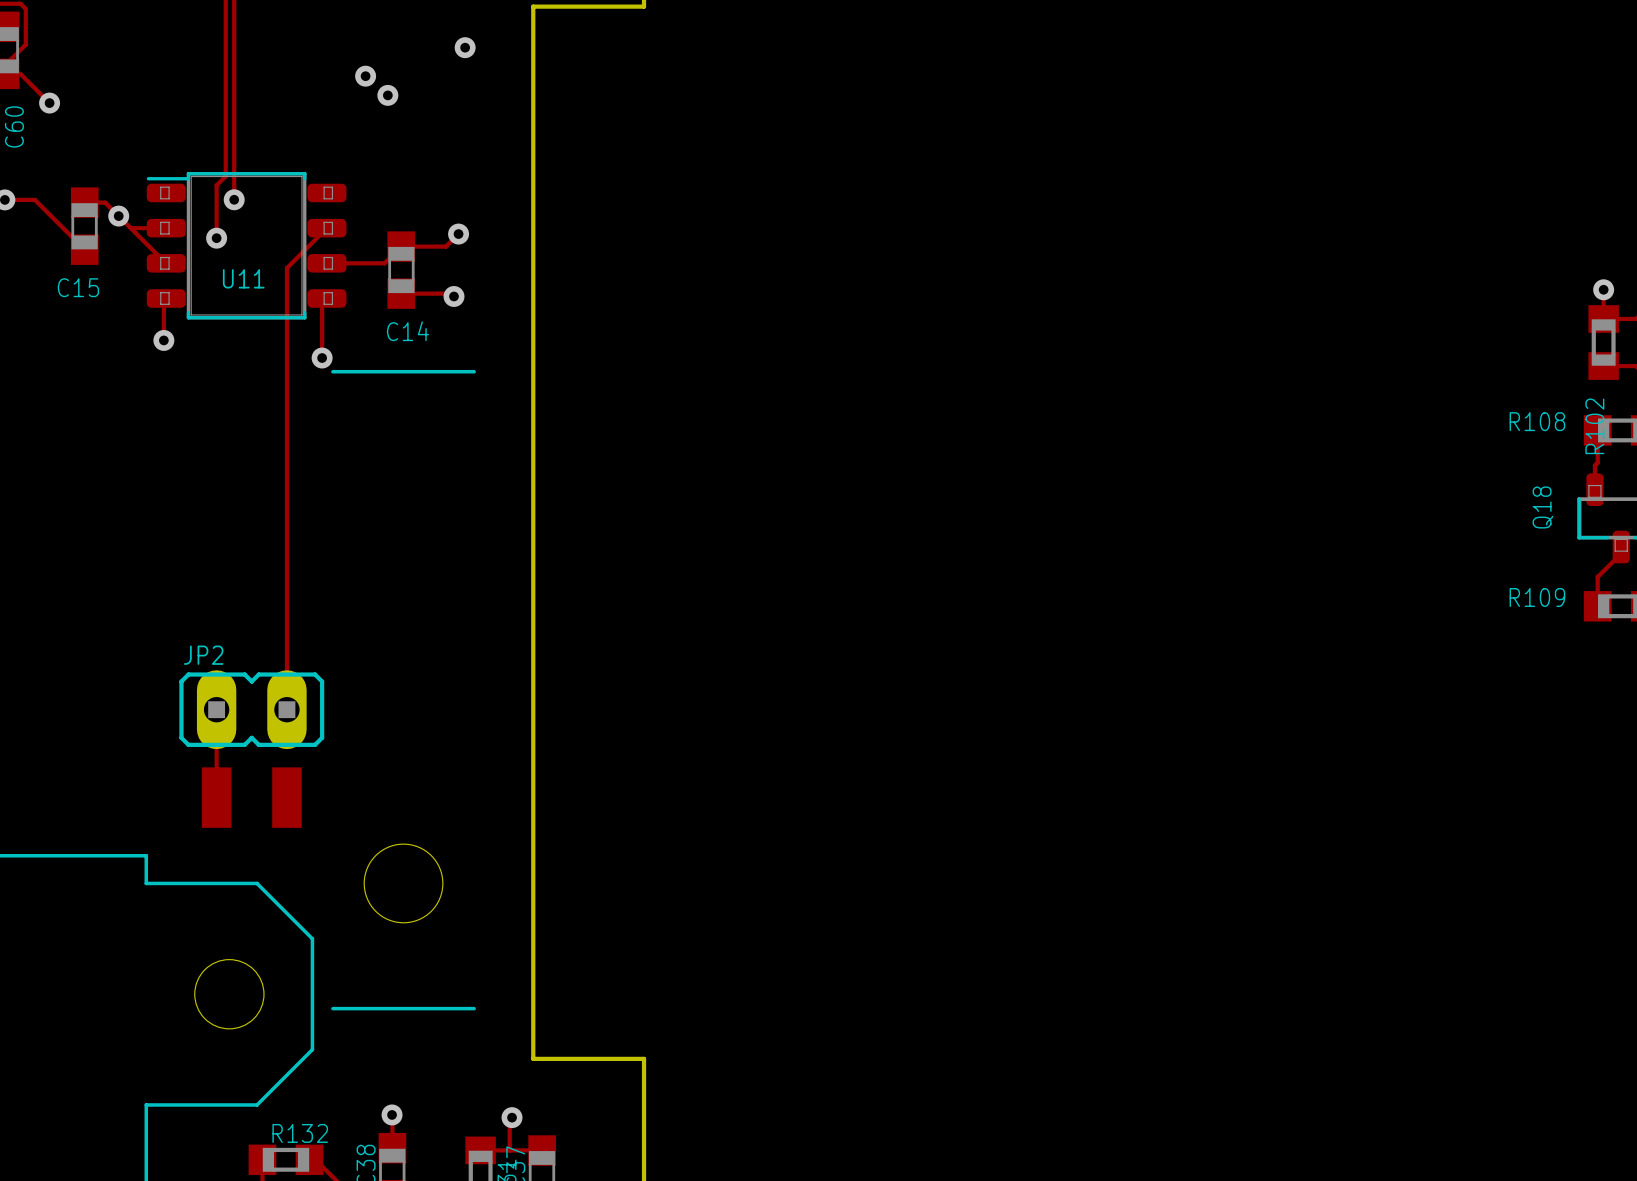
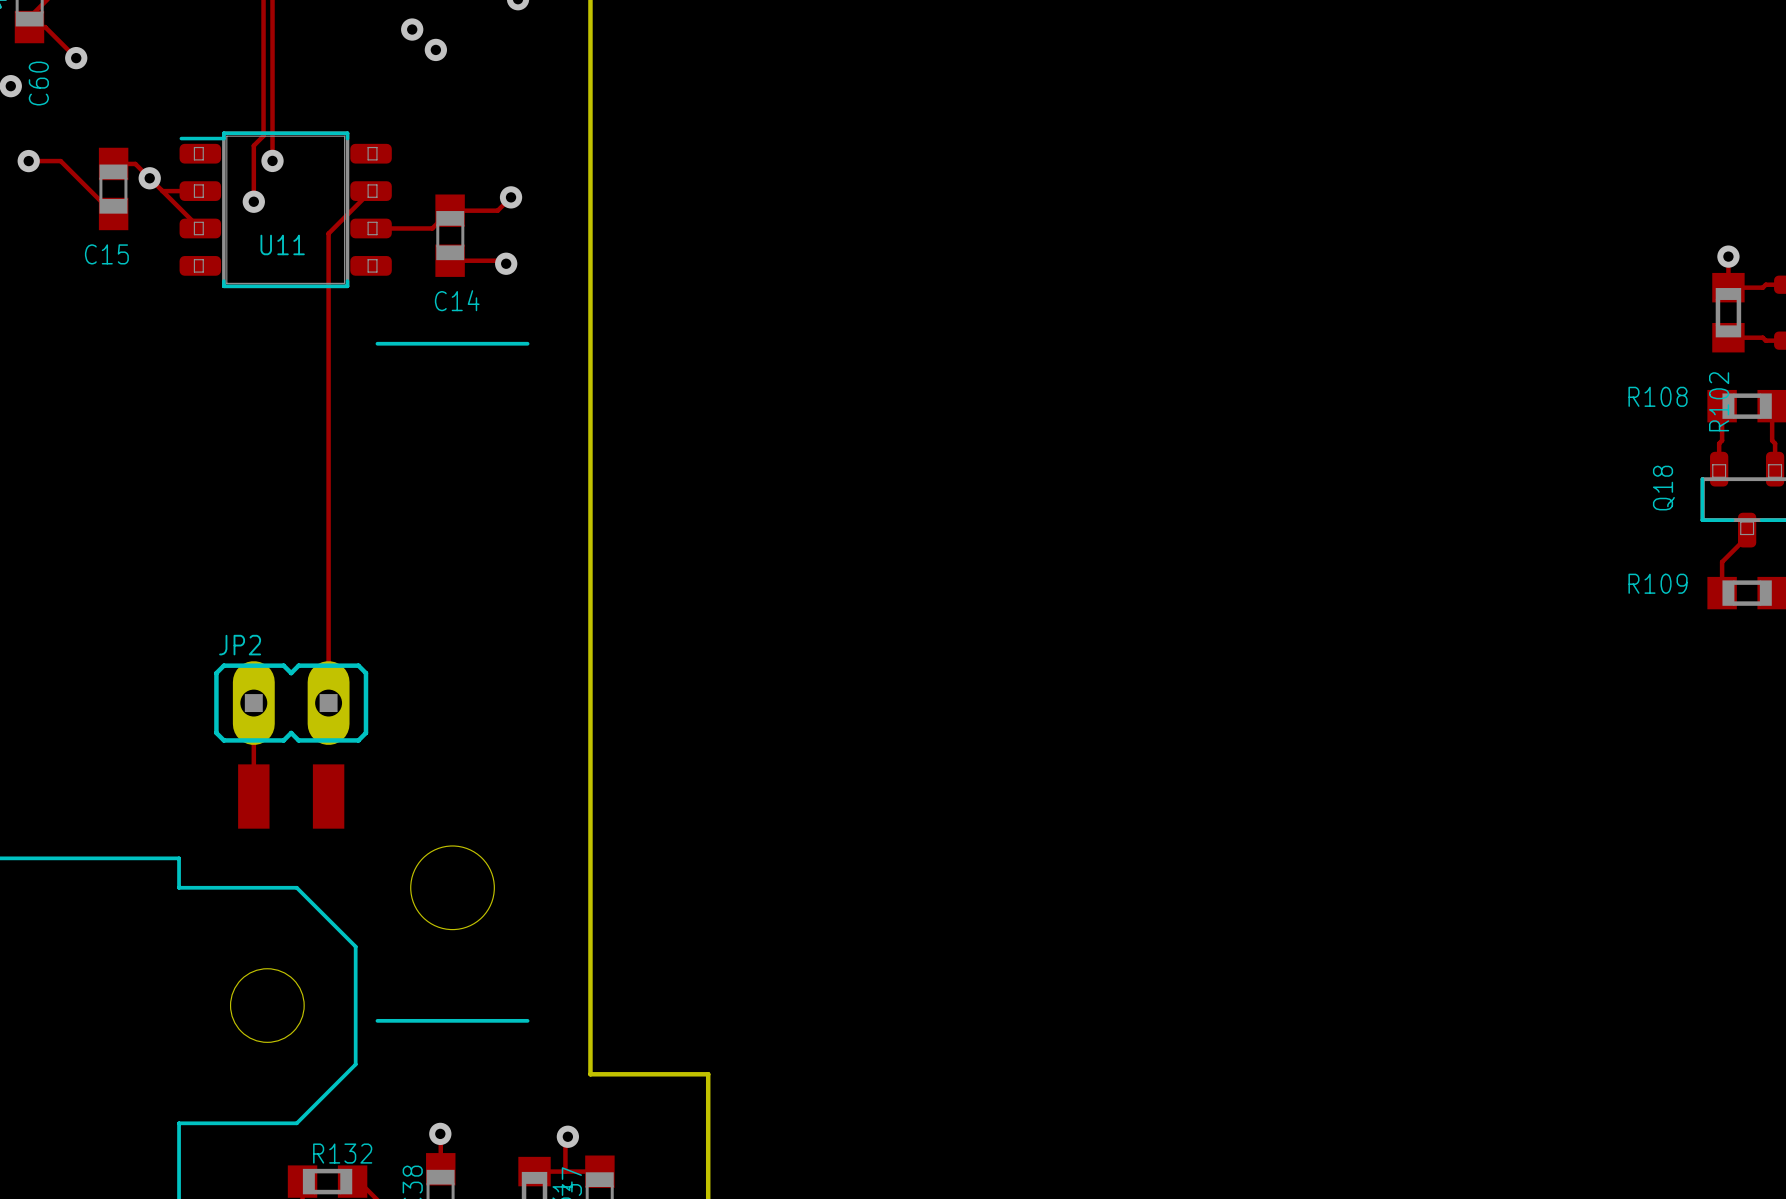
track: (166, 298) (163, 300) (163, 340) -> none
track: (326, 298) (322, 303) (322, 358) -> none
via: (163, 340) -> none
via: (322, 358) -> none

